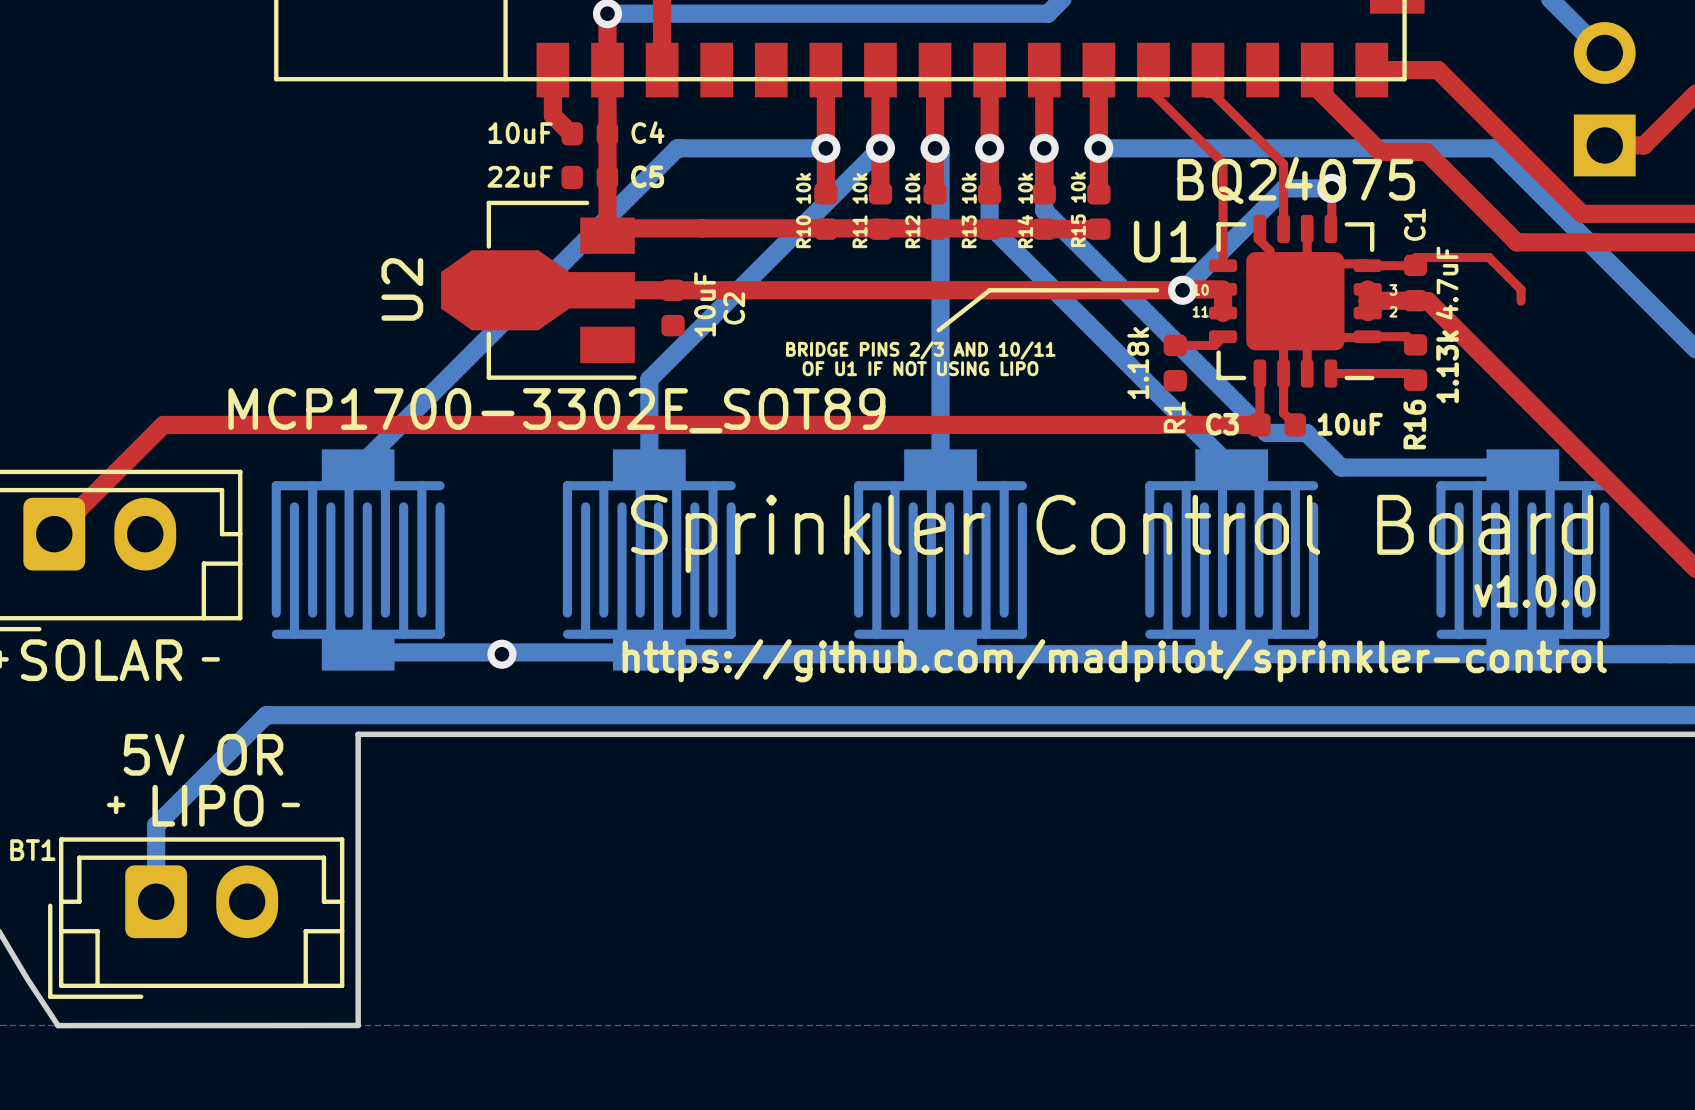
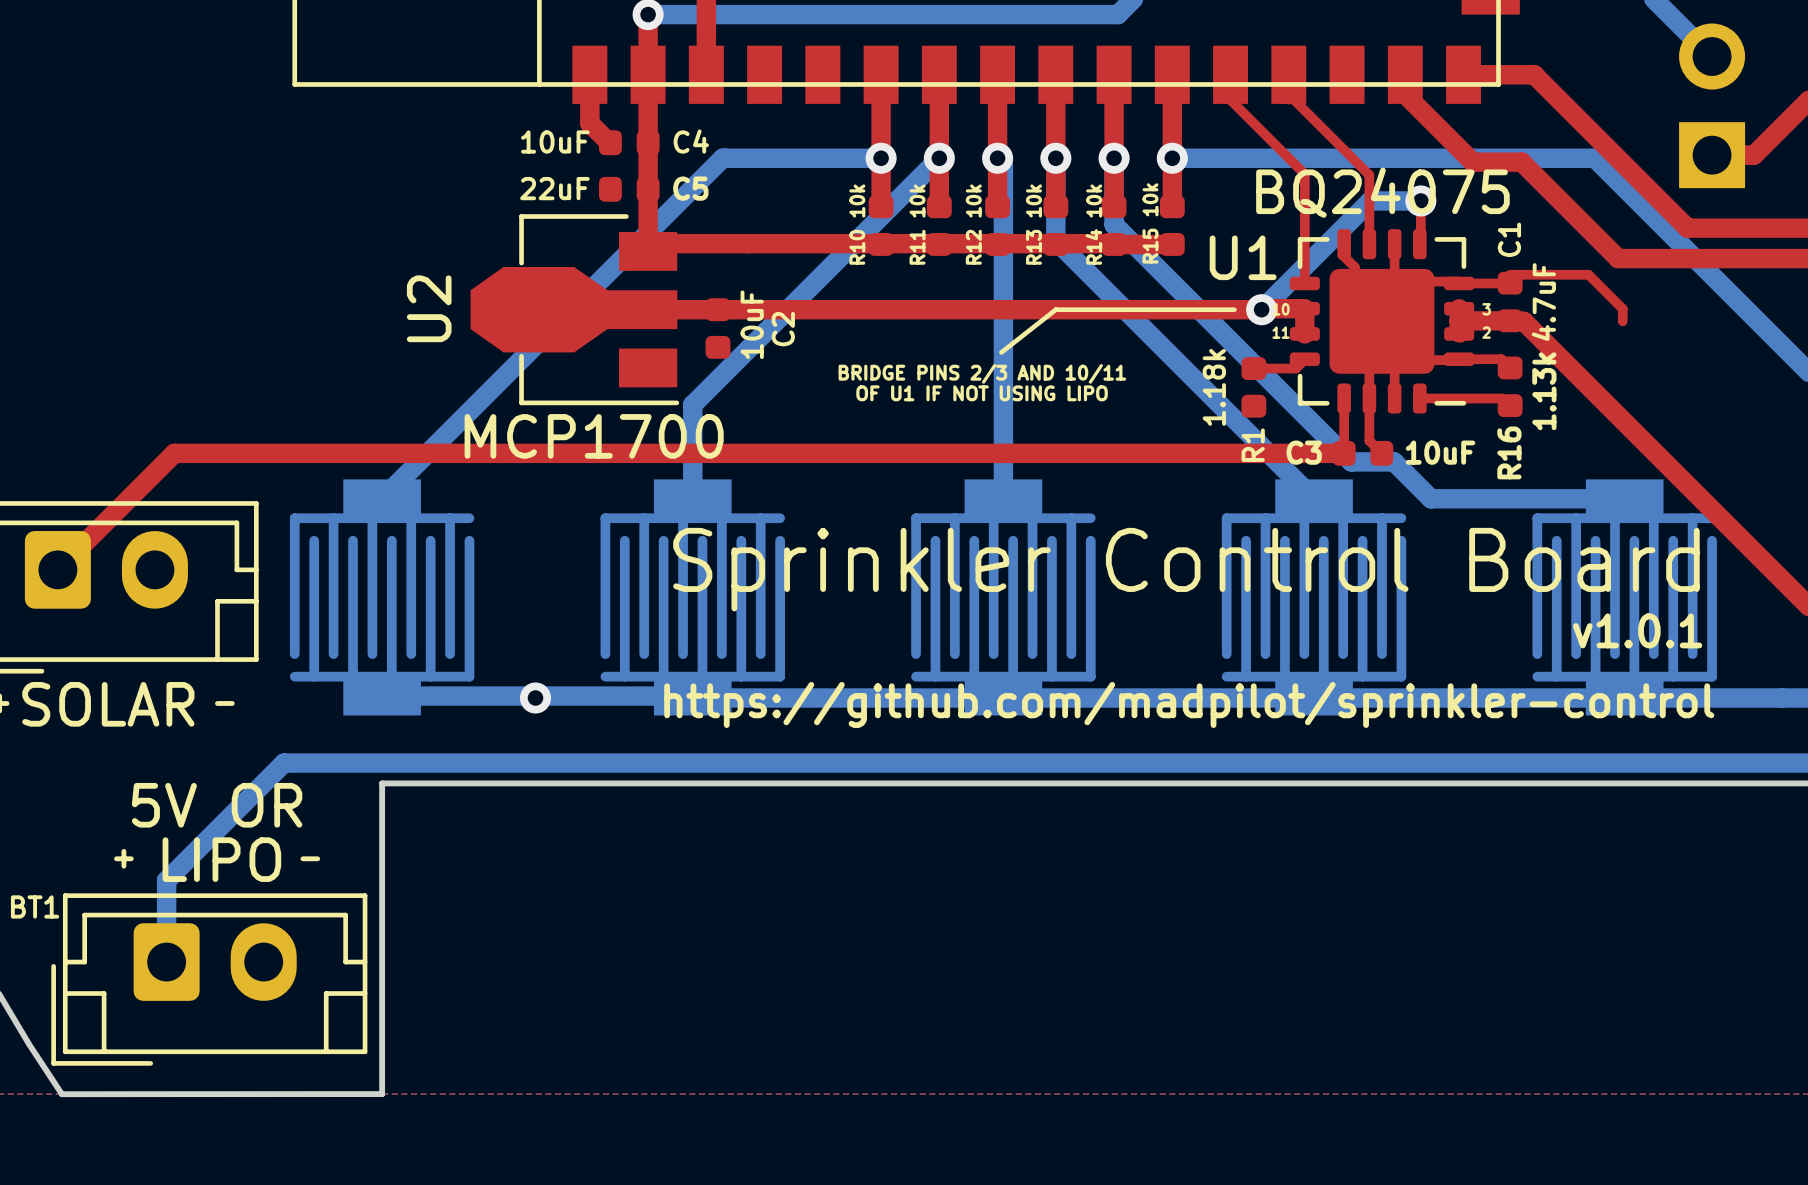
U2 value: MCP1700-3302E_SOT89 (556, 410) -> MCP1700 (594, 436)
text: v1.0.0 (1534, 591) -> v1.0.1 (1637, 630)

